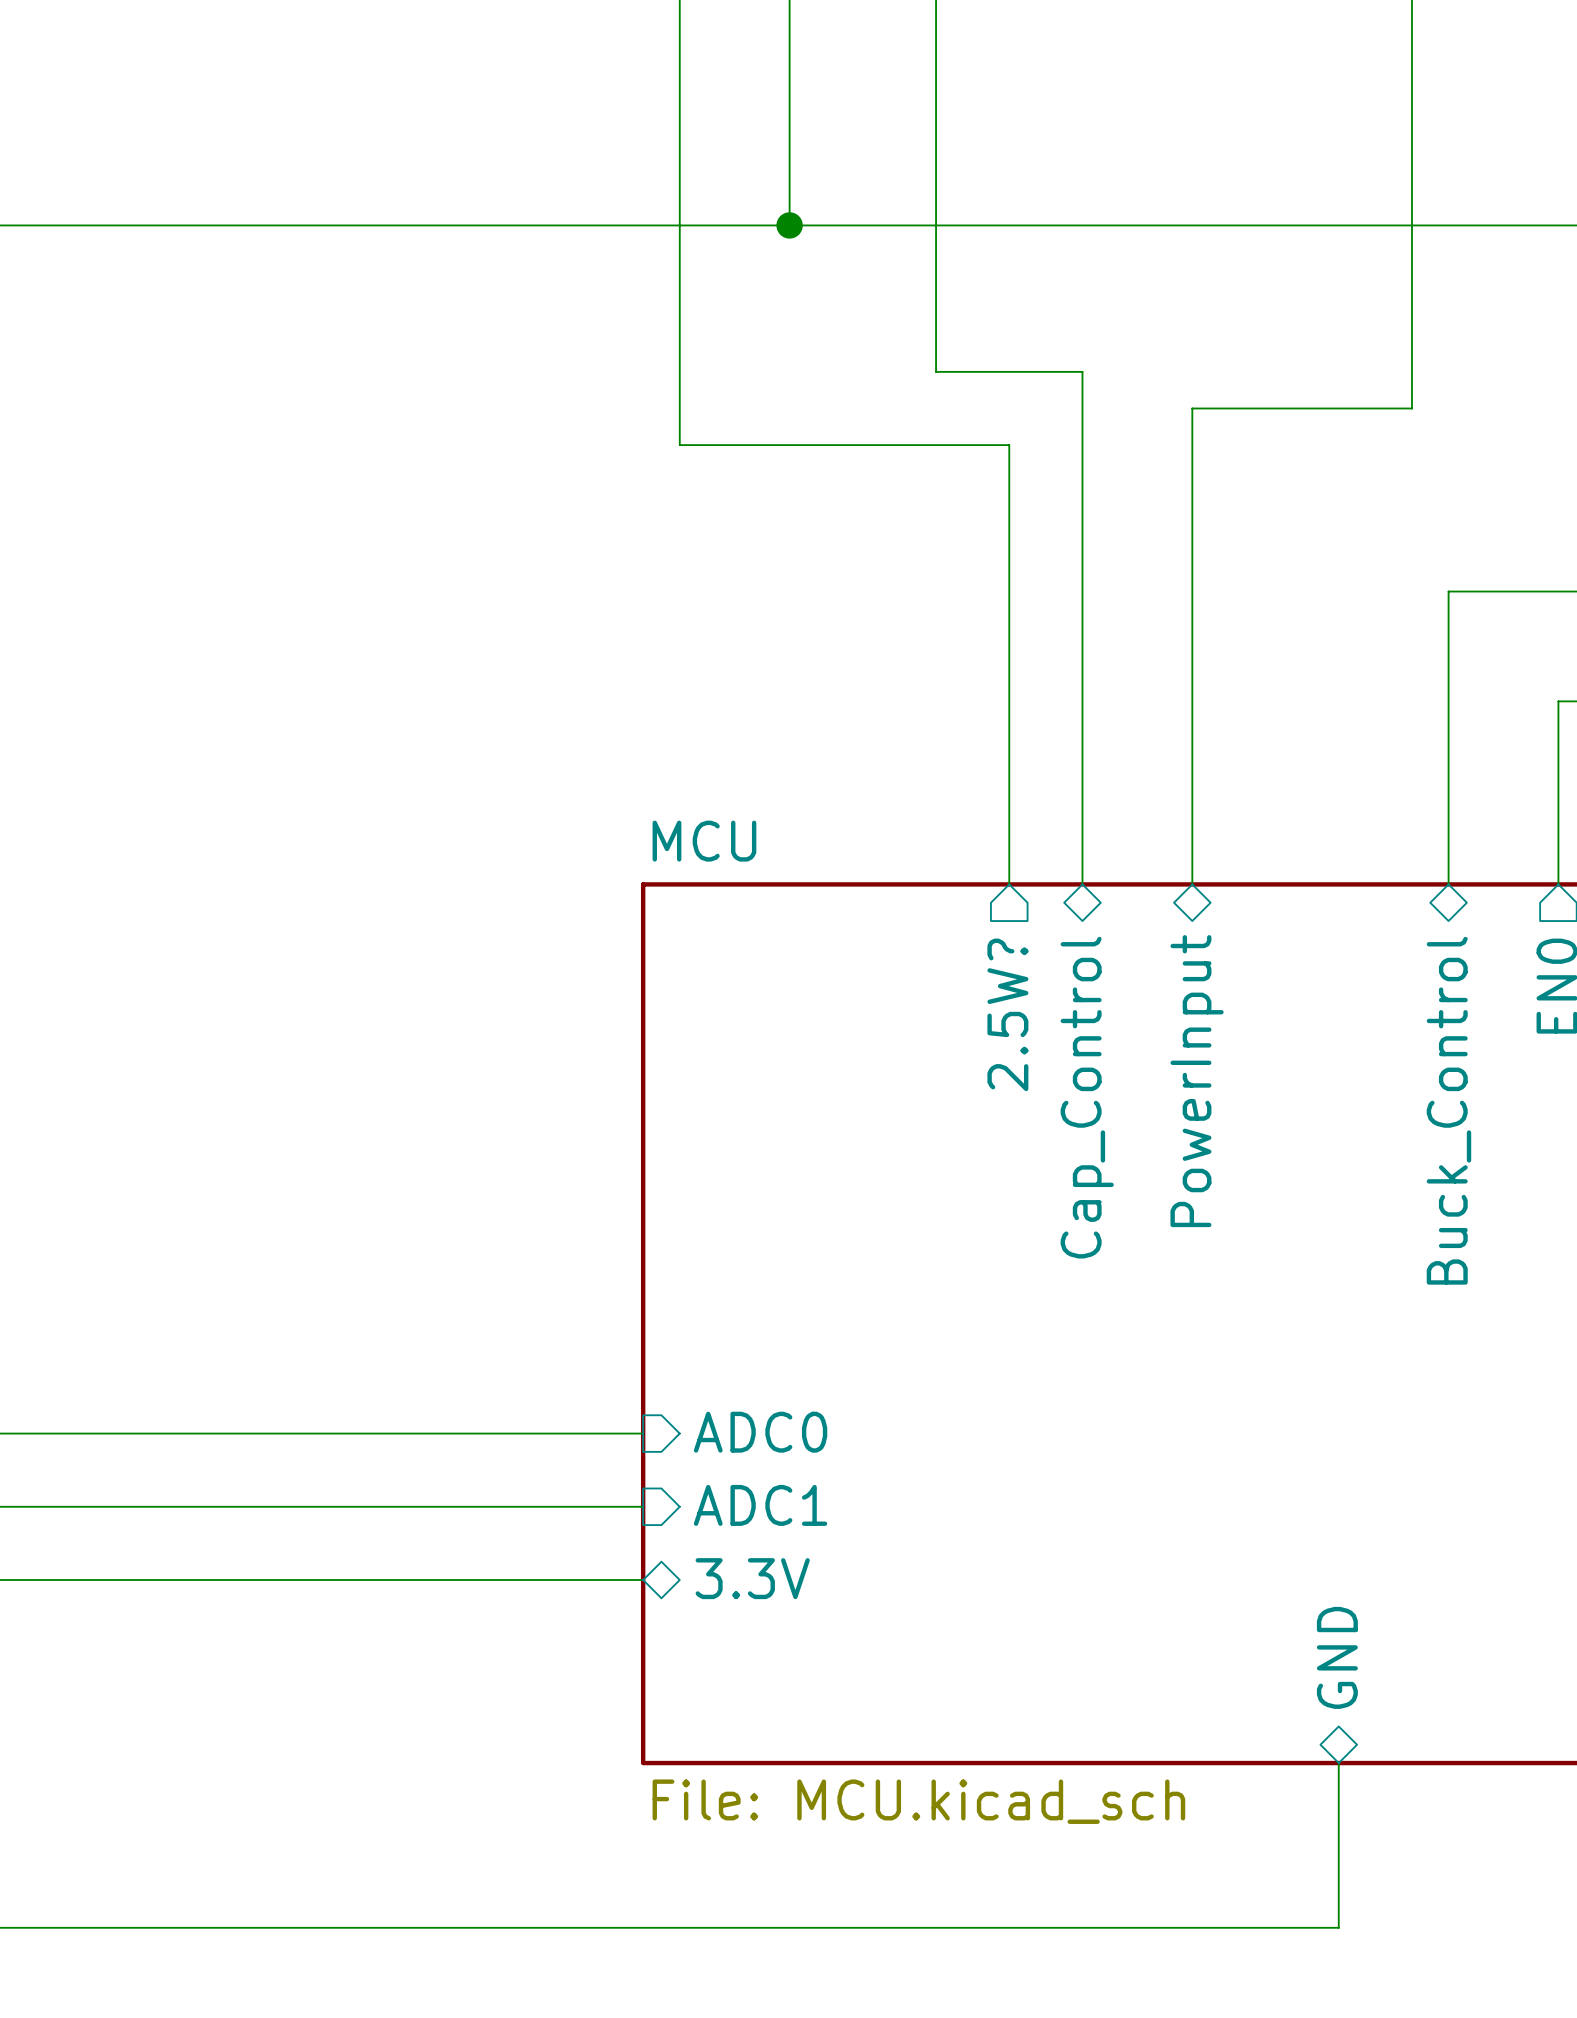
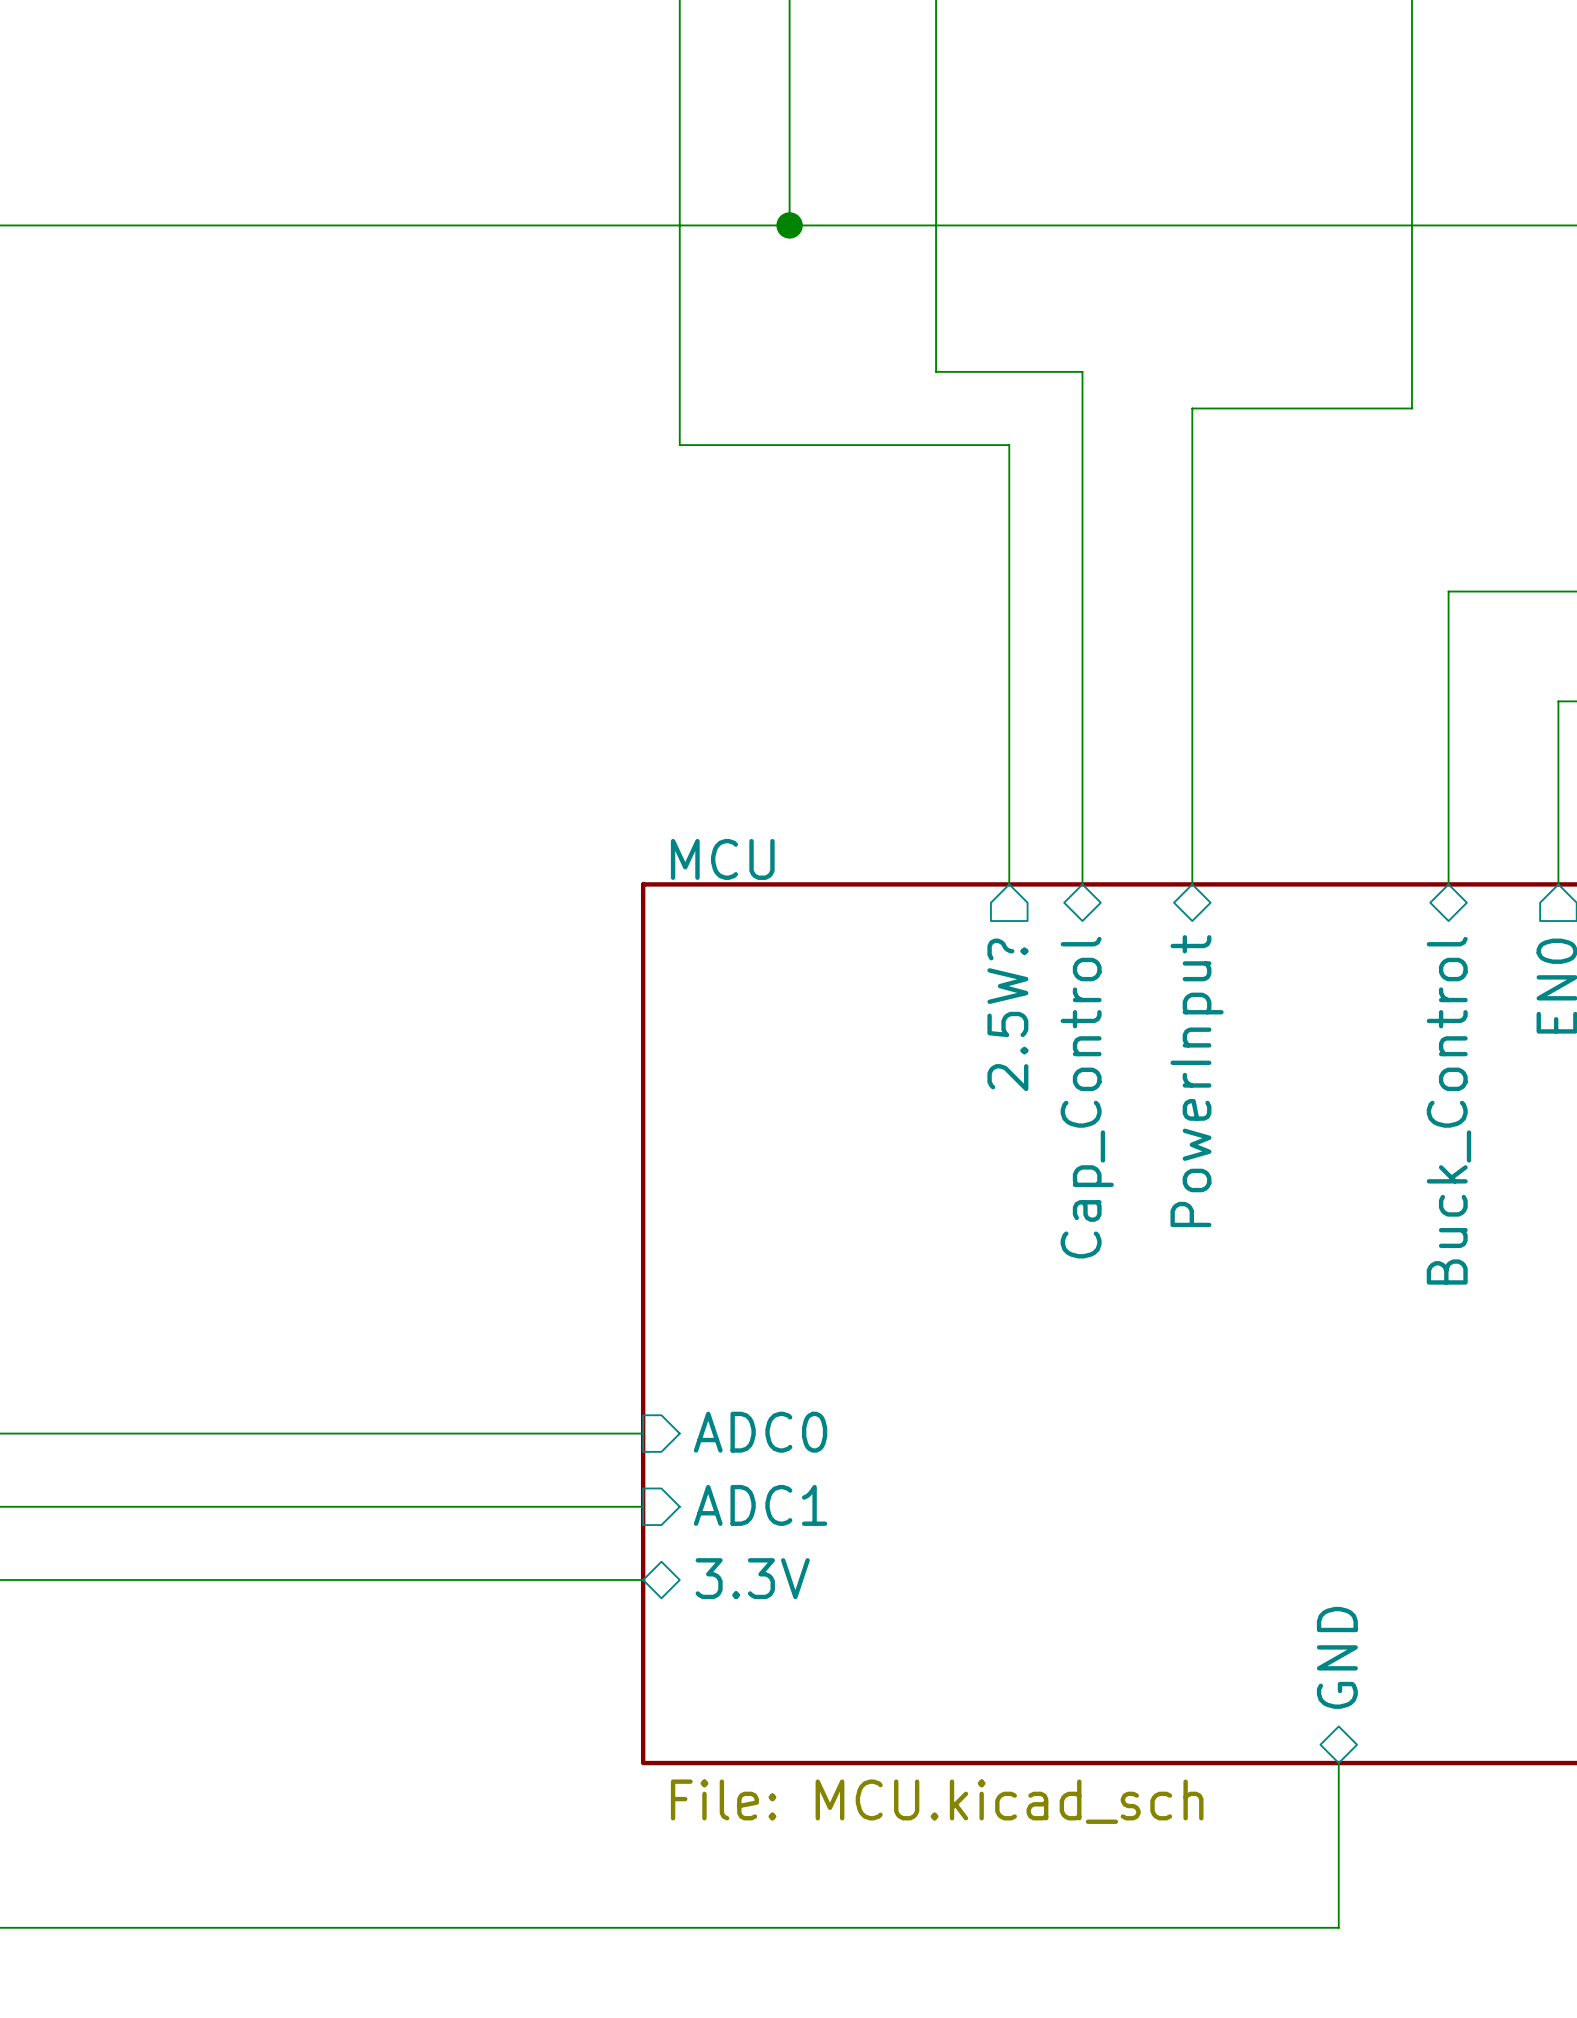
sheet MCU name position: MCU (704, 841) -> MCU (722, 859)
sheet MCU value position: File: MCU.kicad_sch (918, 1801) -> File: MCU.kicad_sch (937, 1801)

